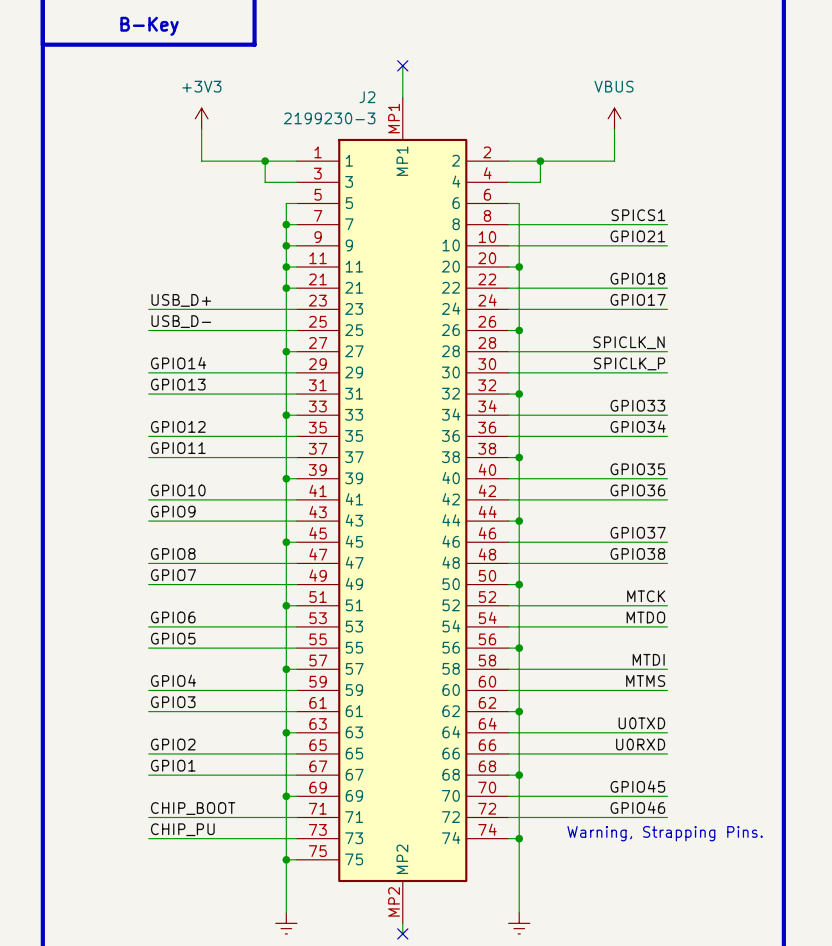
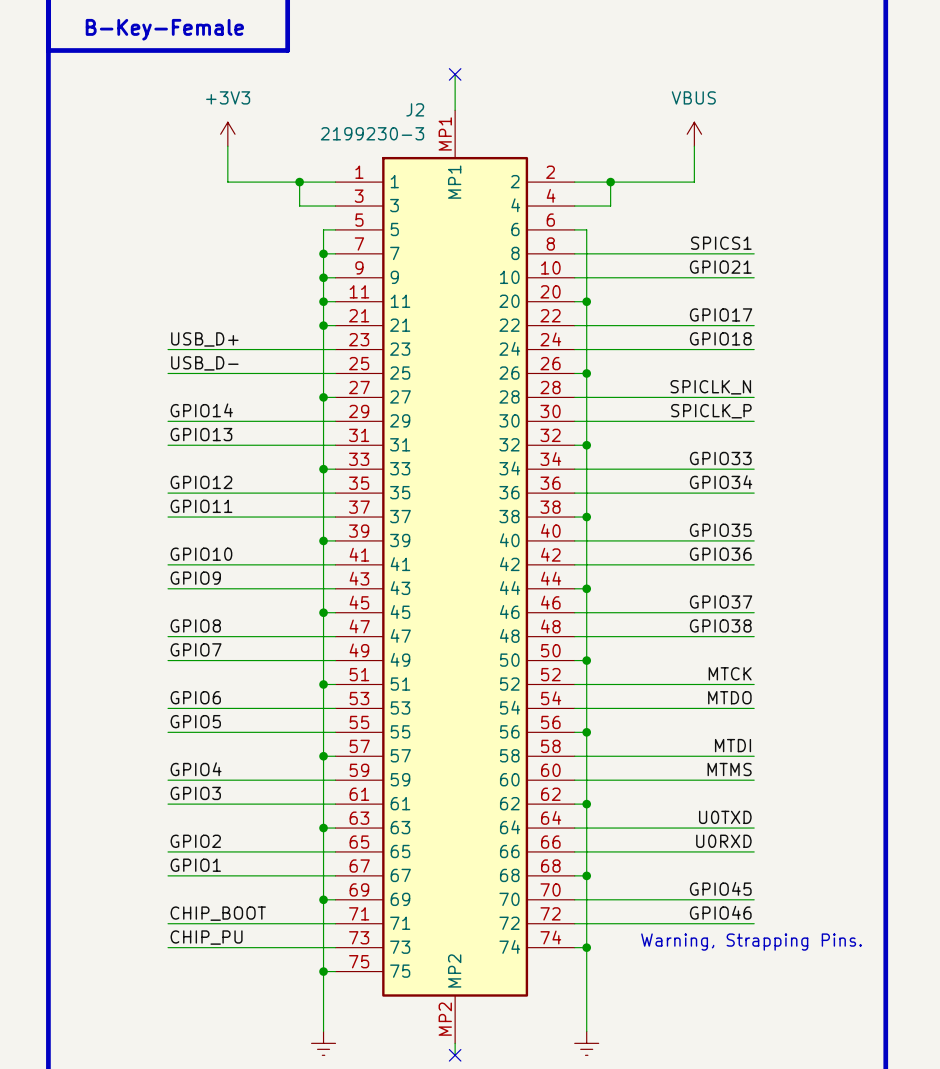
text: none -> B-Key-Female (164, 29)
text: B-Key (149, 26) -> none
label: GPIO18 (637, 278) -> GPIO17 (721, 314)
label: GPIO17 (638, 299) -> GPIO18 (720, 338)

